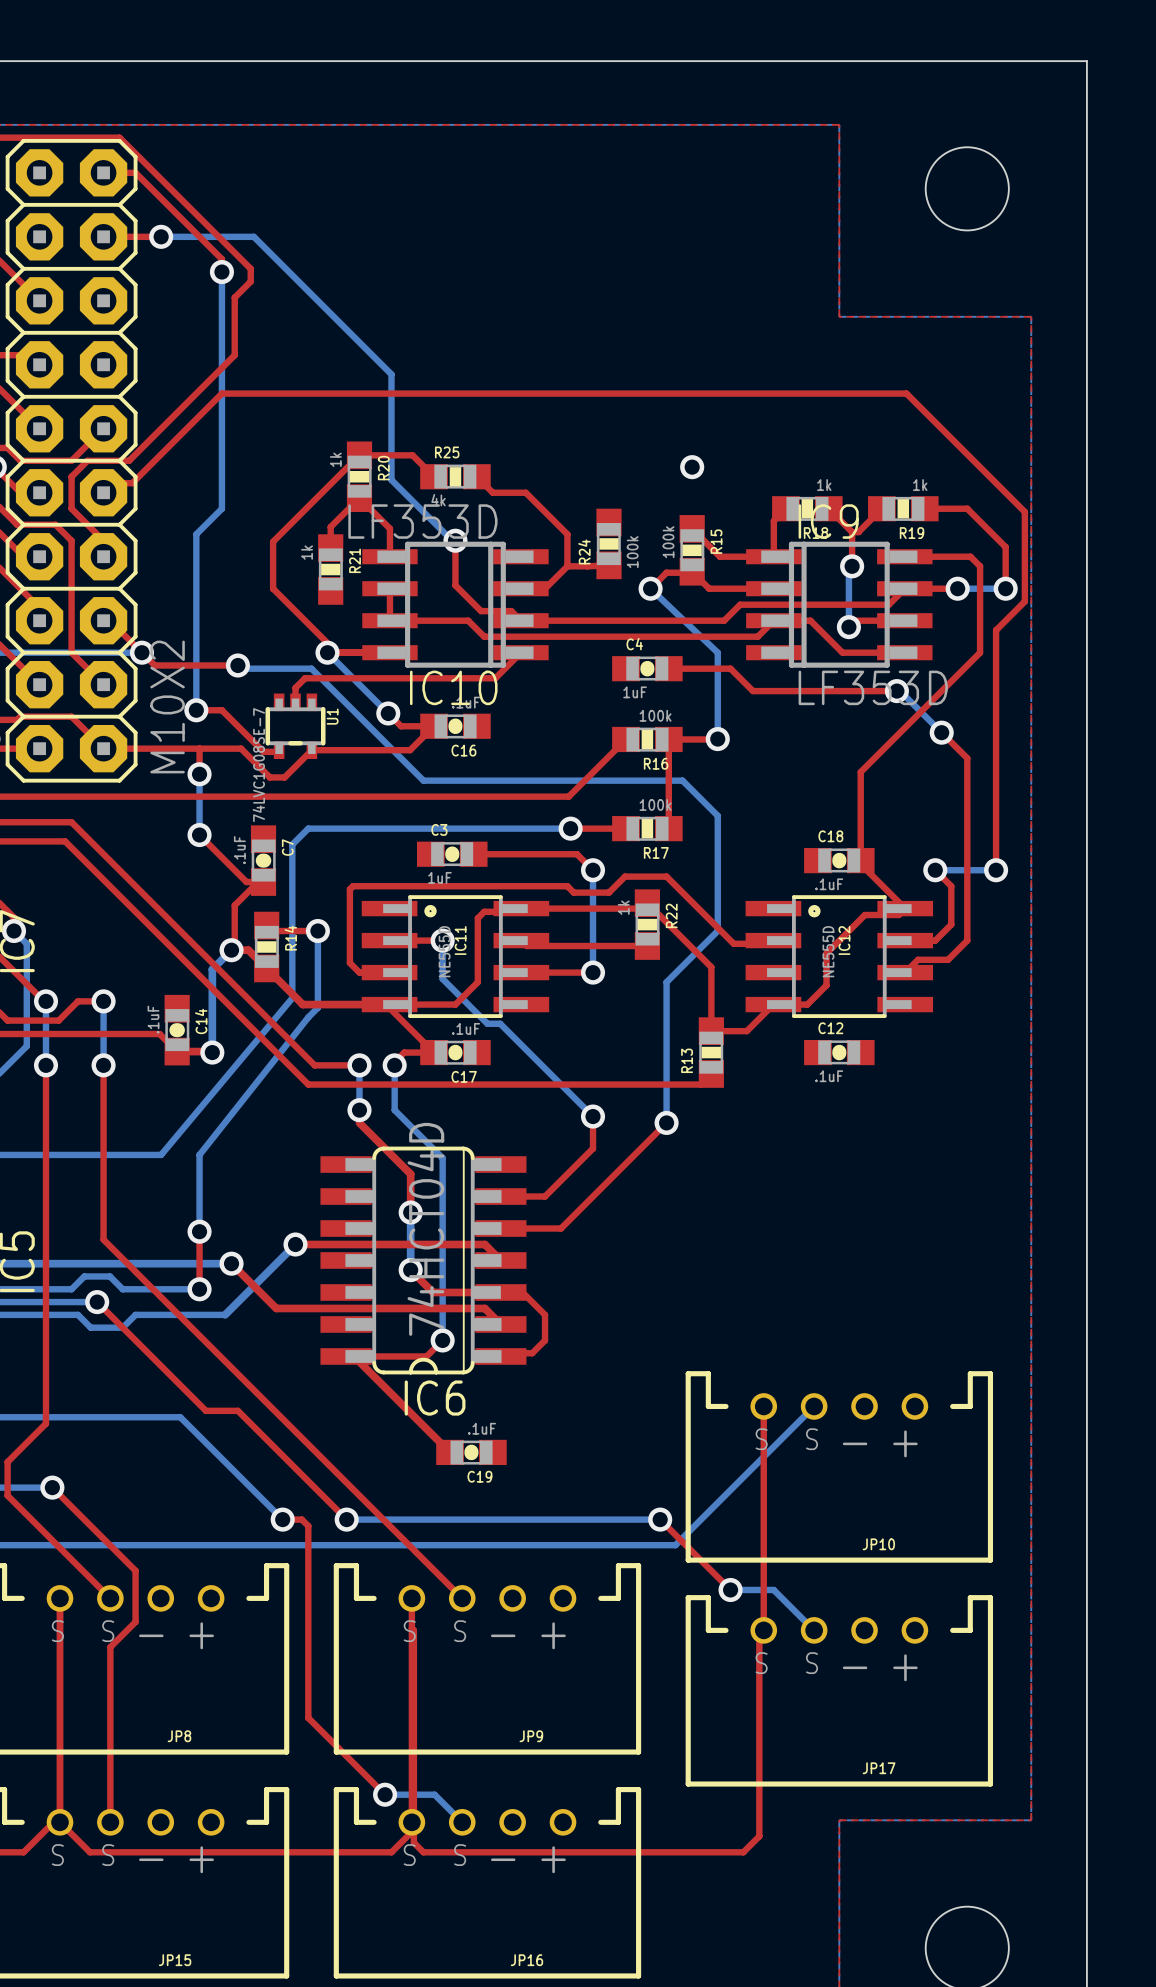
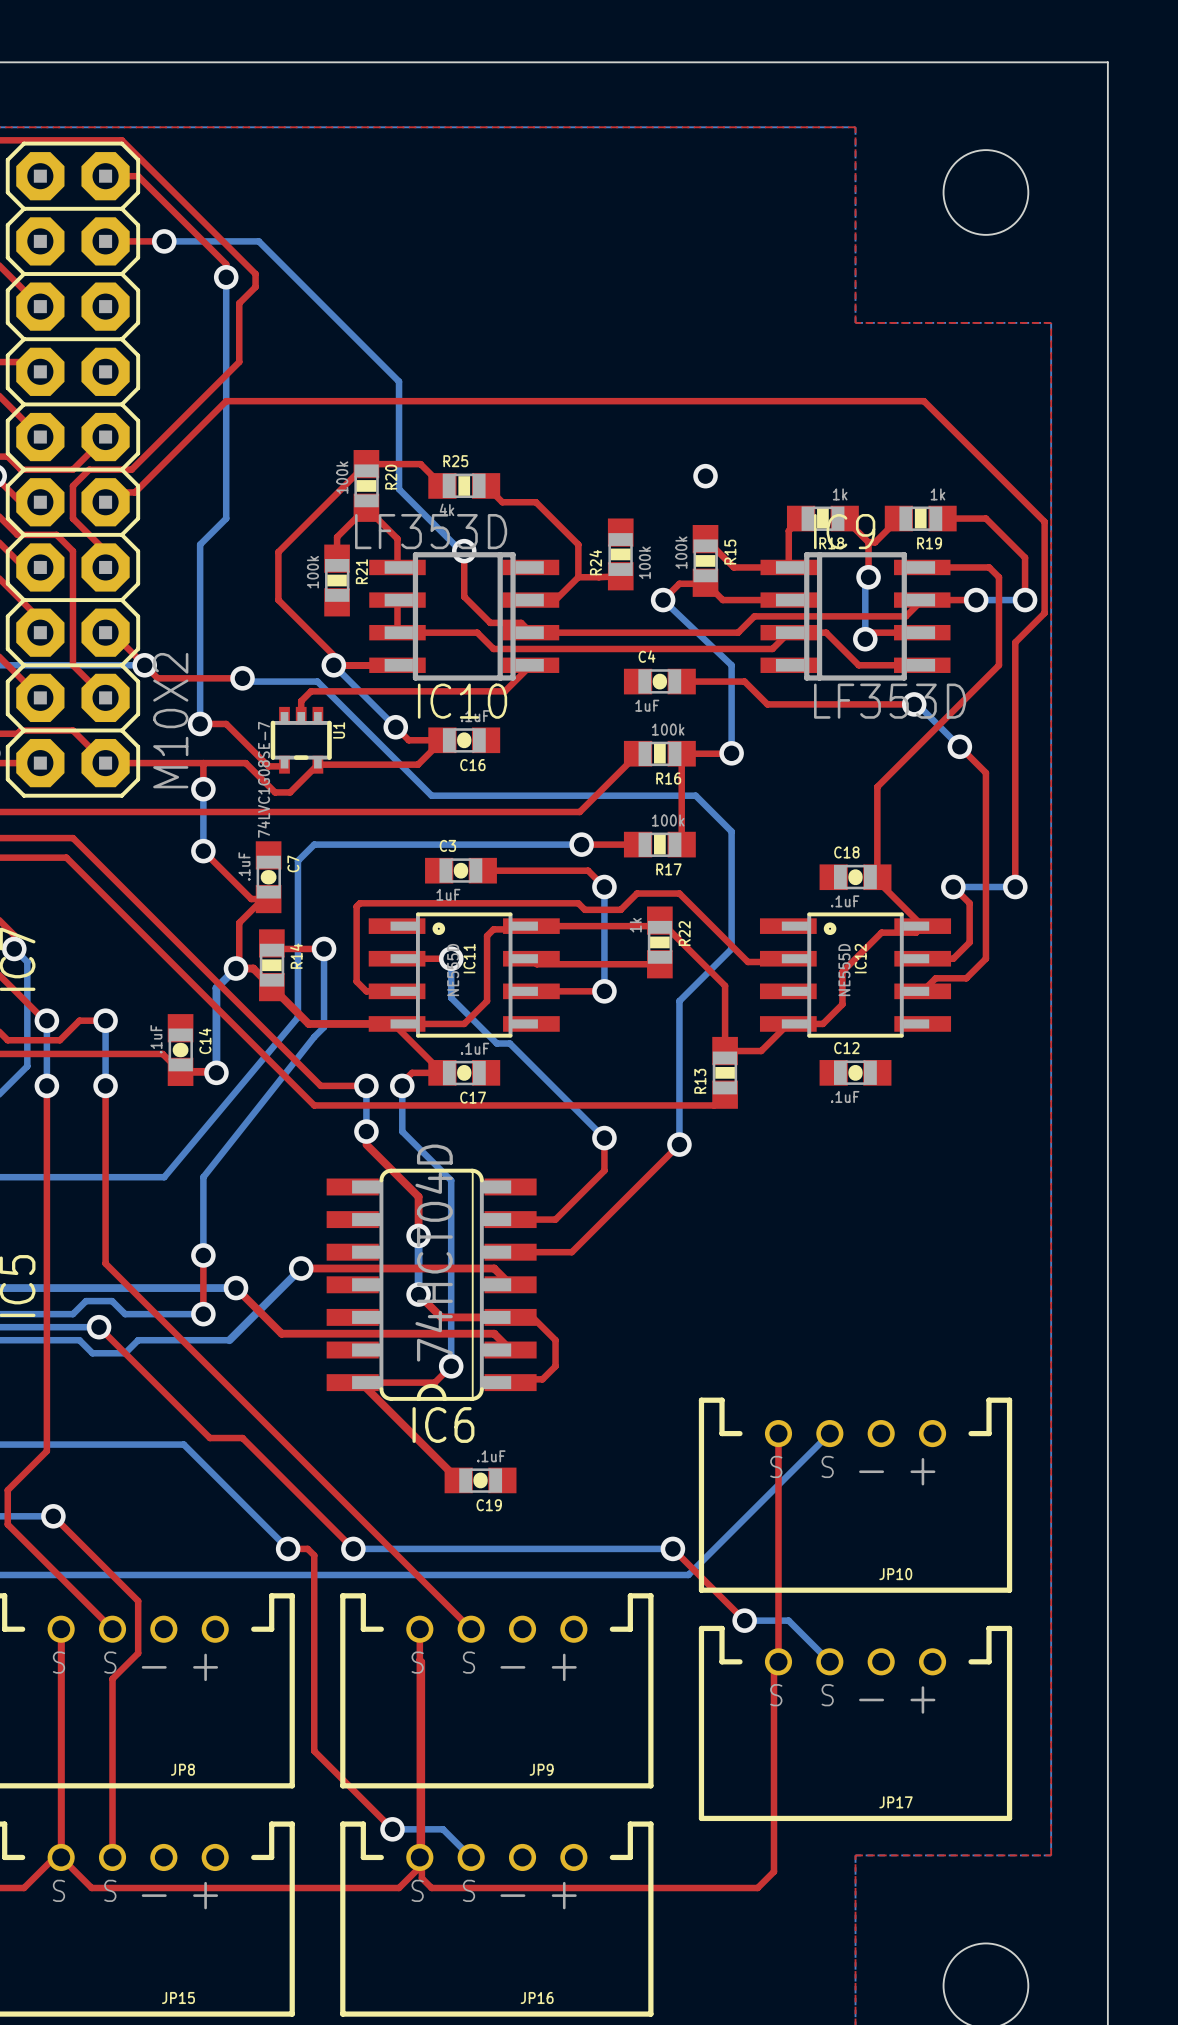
R20 value: 1k (335, 459) -> 100k (342, 477)
R21 value: 1k (307, 552) -> 100k (312, 572)

